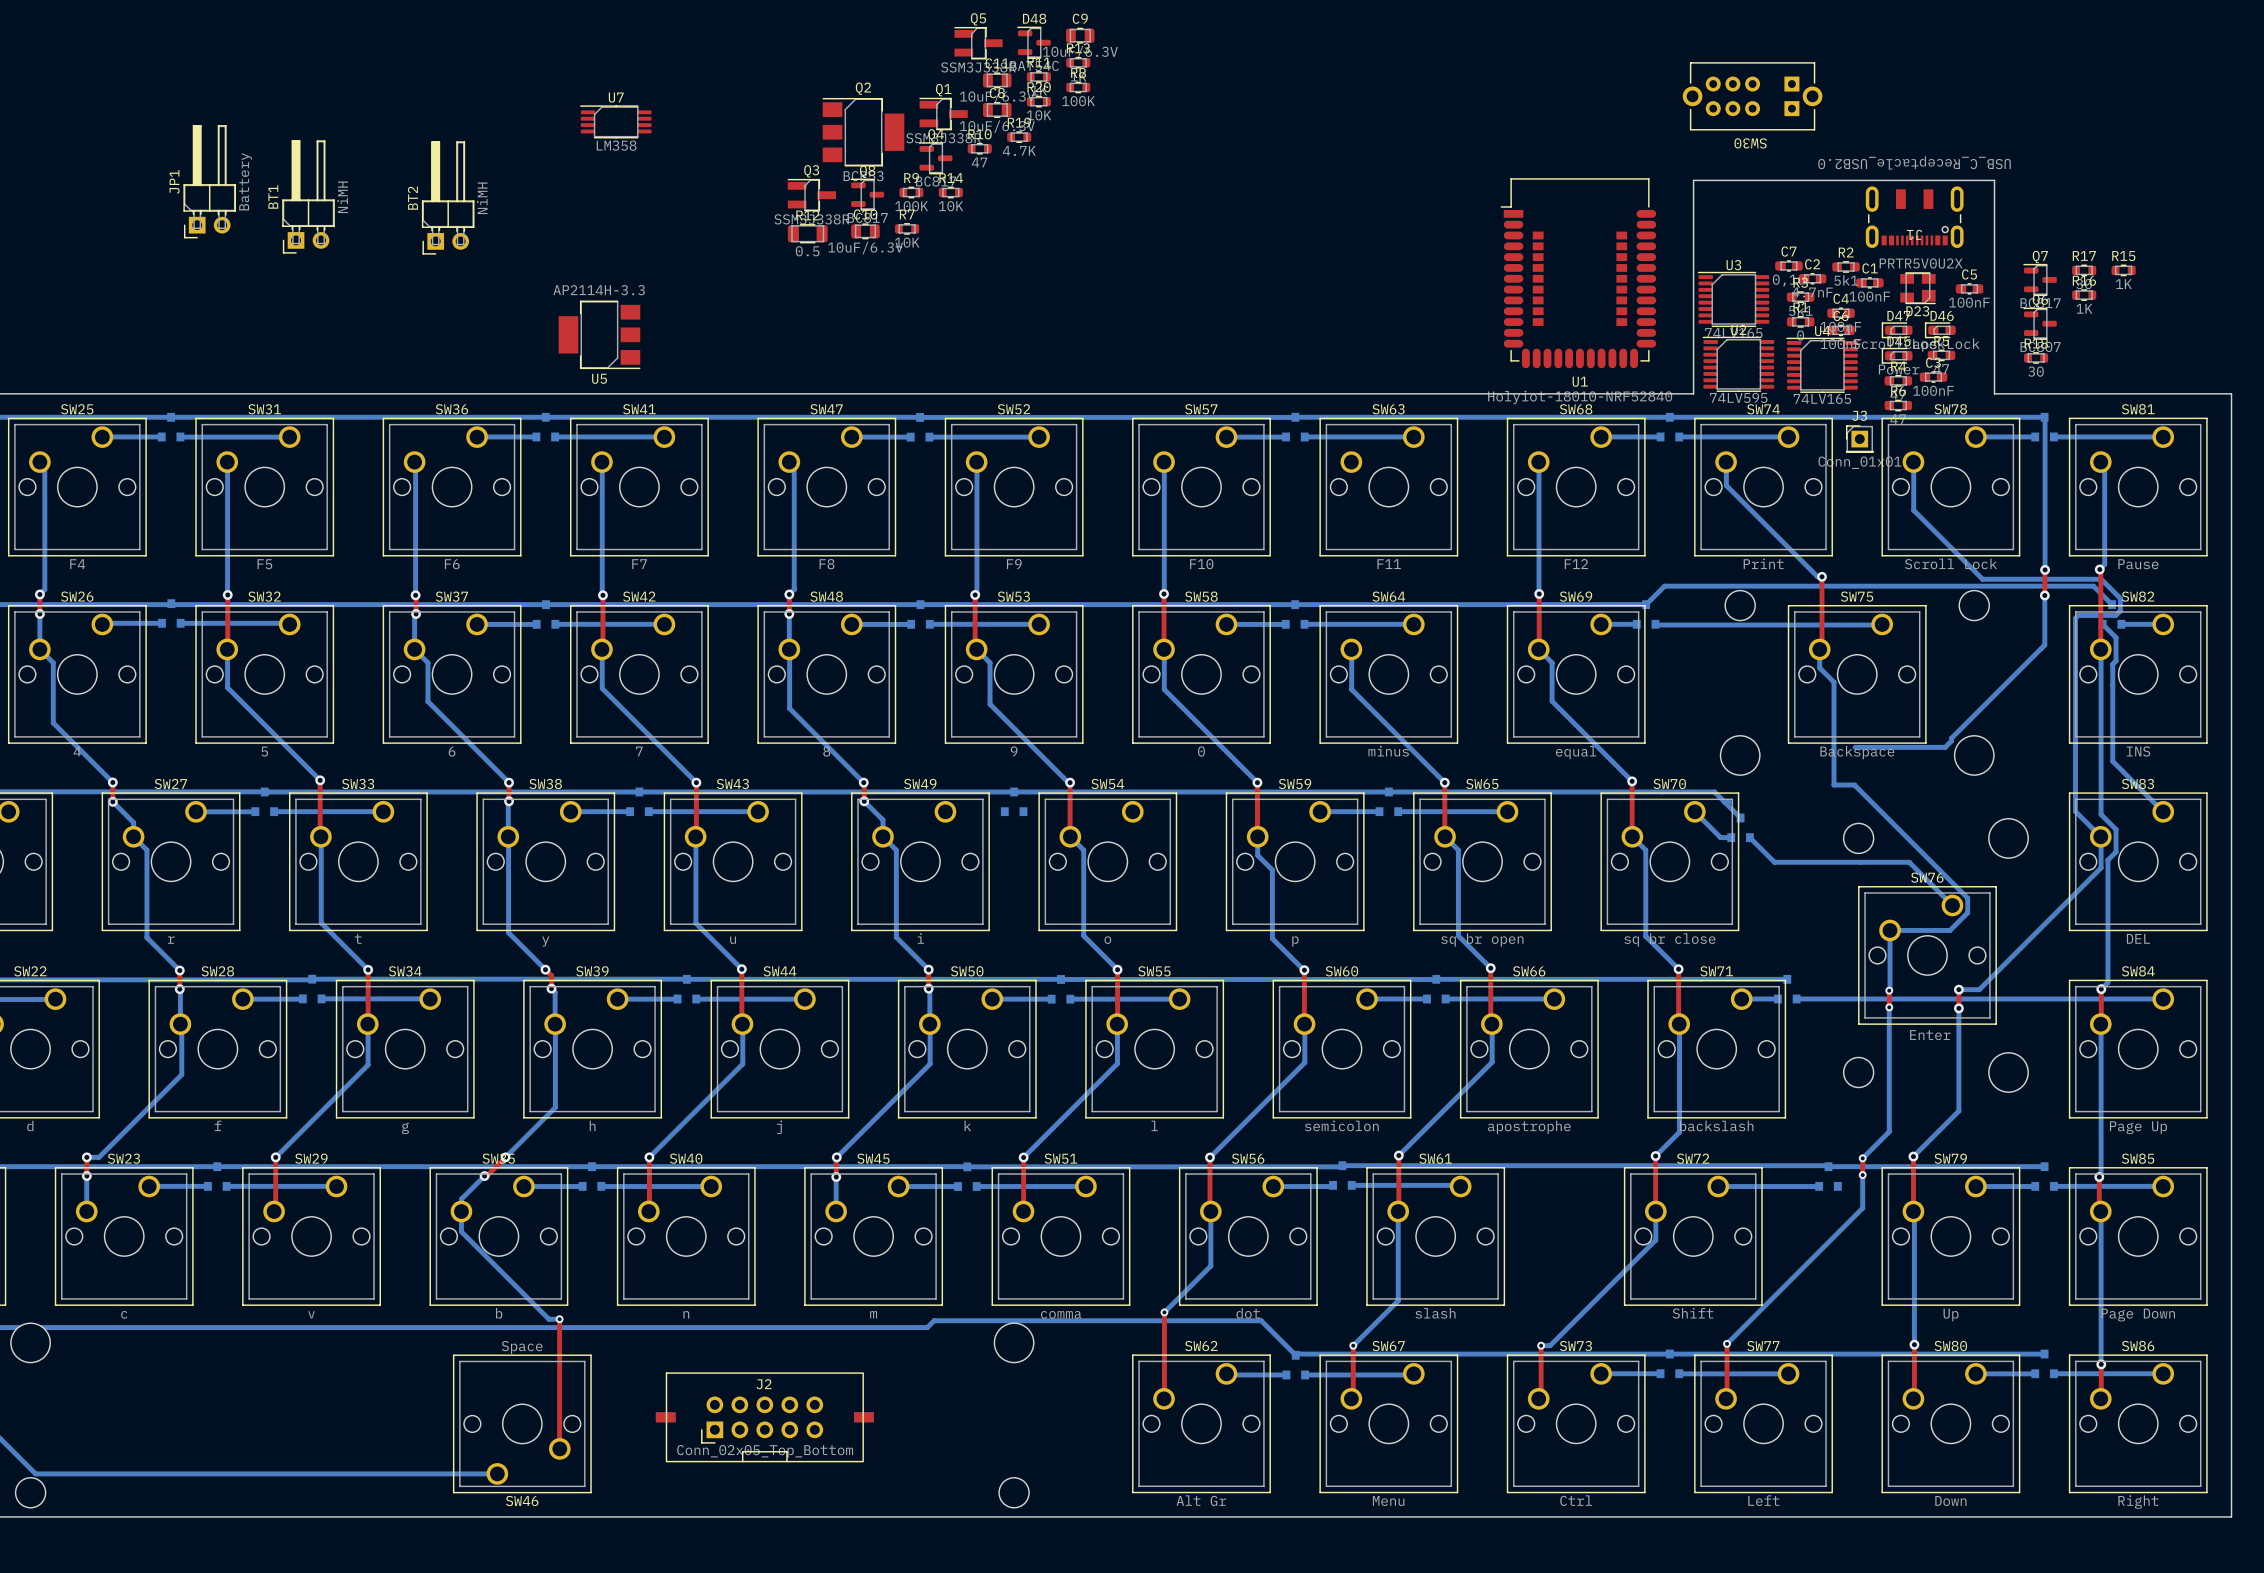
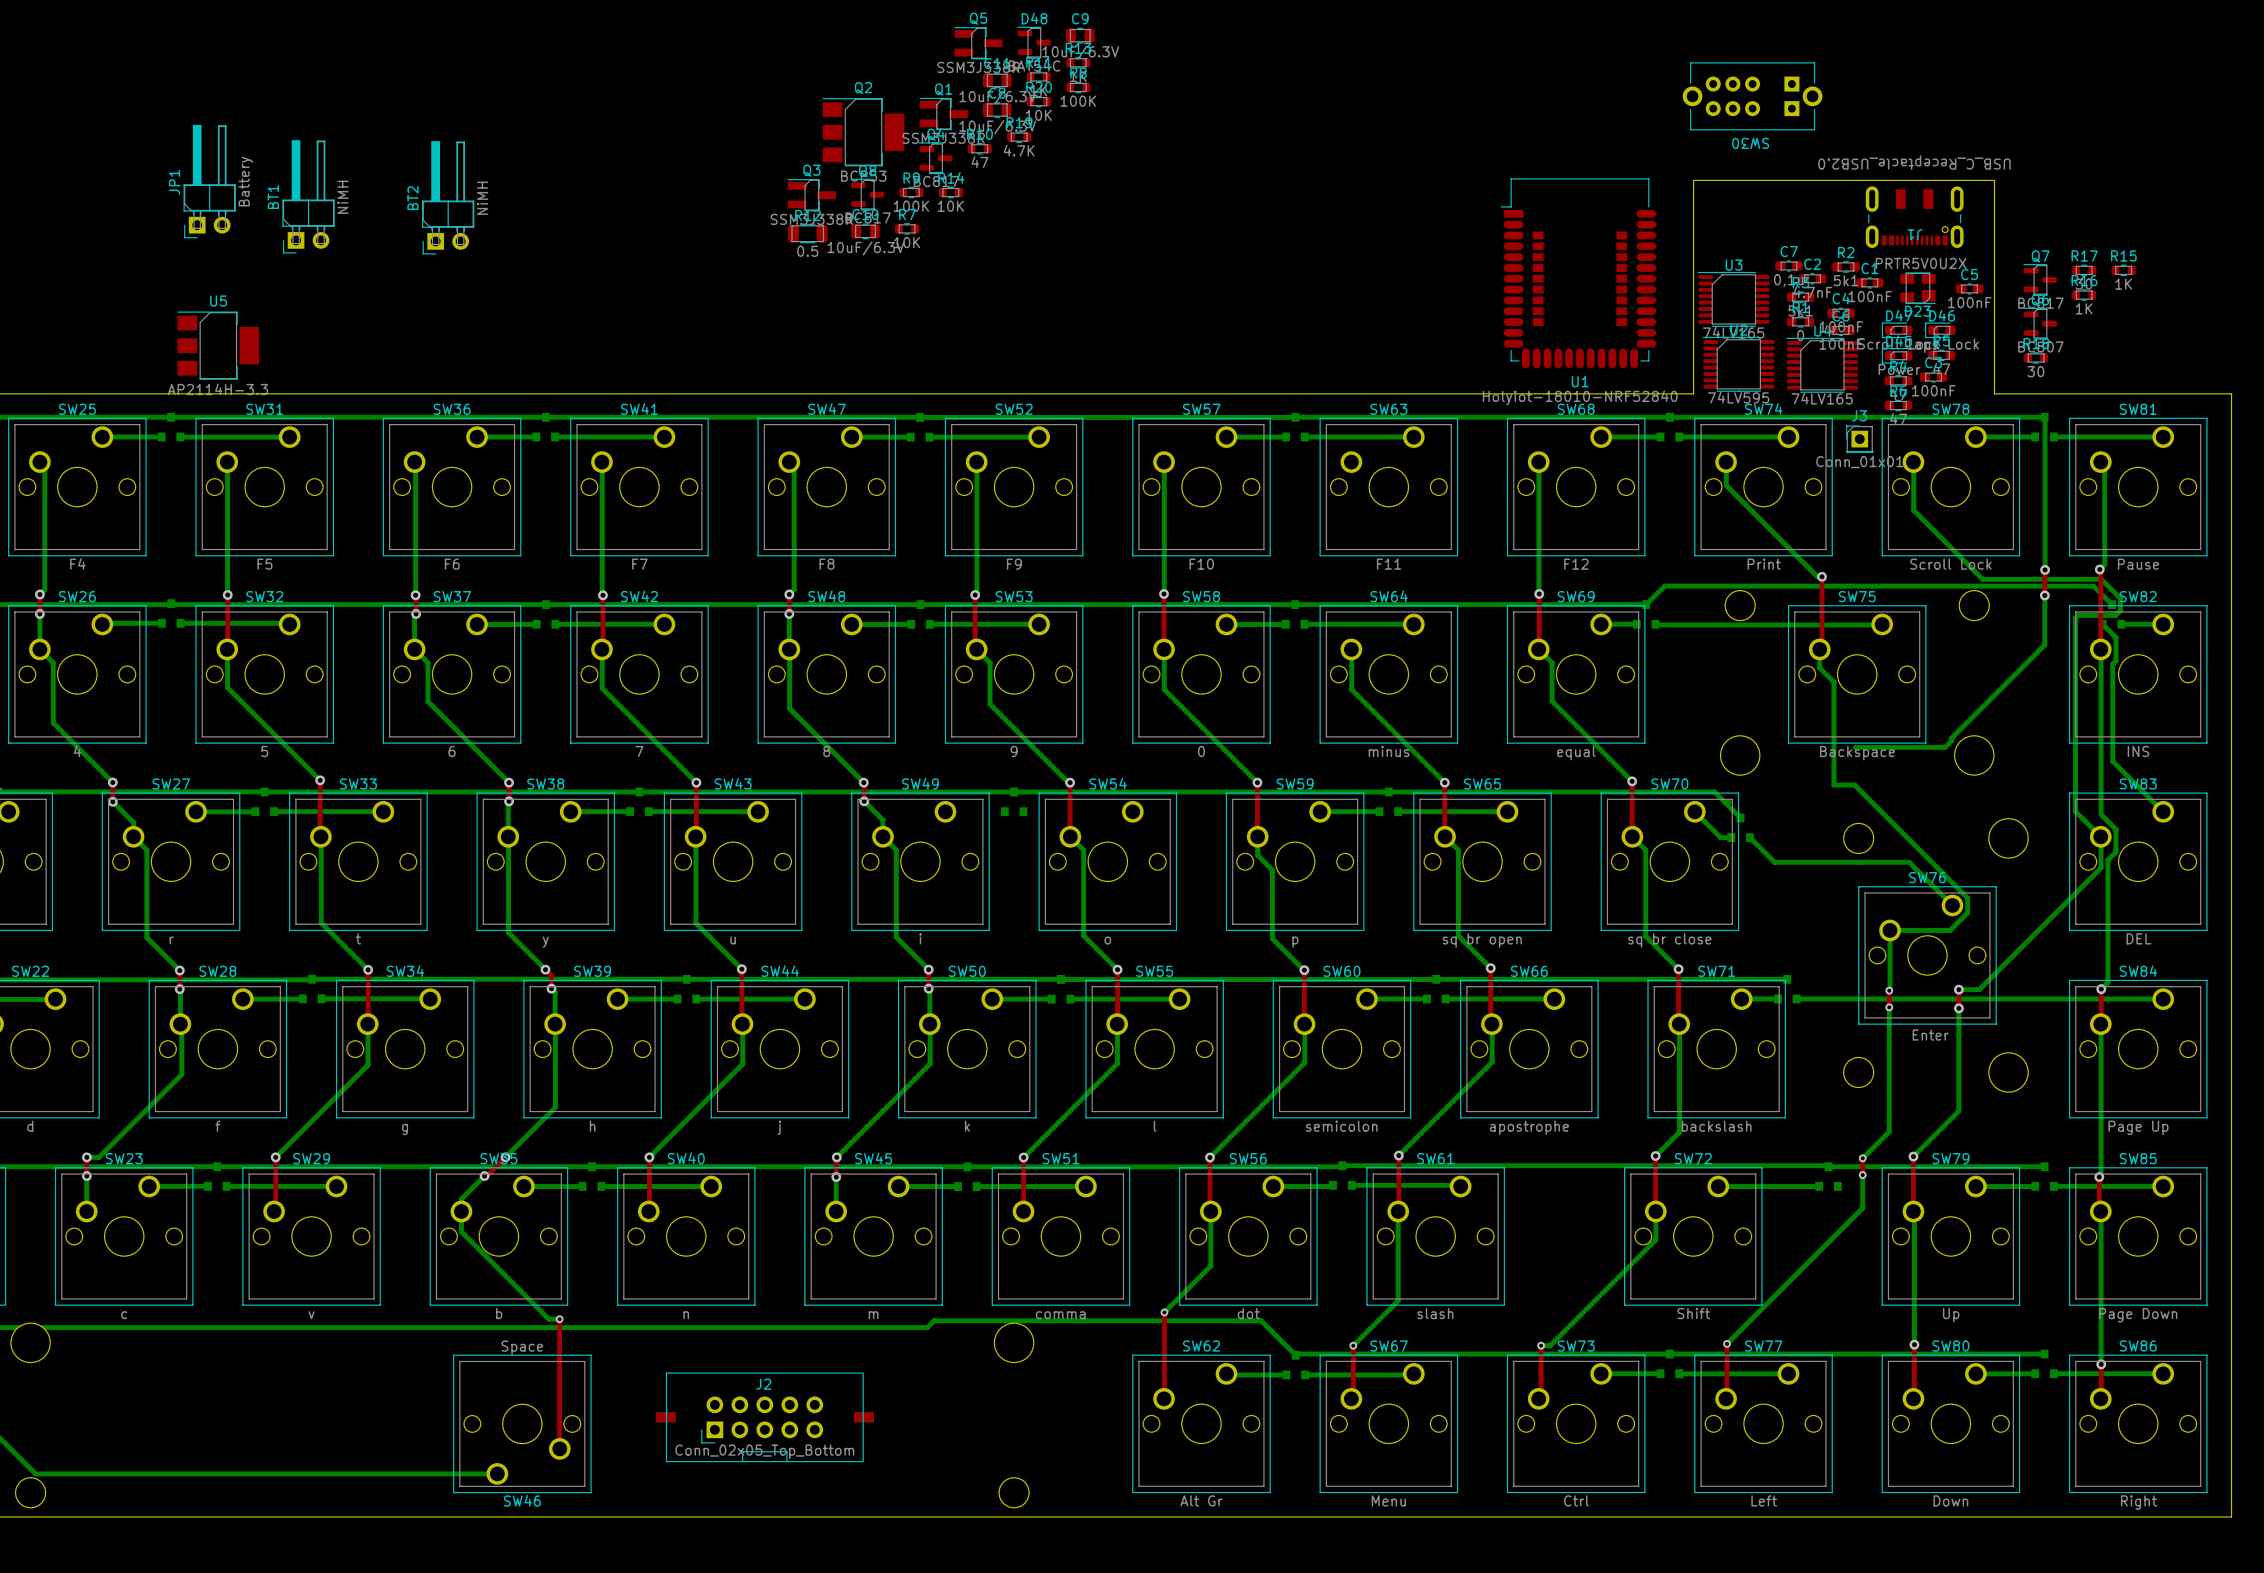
U7: LM358 (615, 121) -> none
U5 rotation: 0° (599, 334) -> 180° (218, 345)
U5 position: (599, 334) -> (218, 345)

